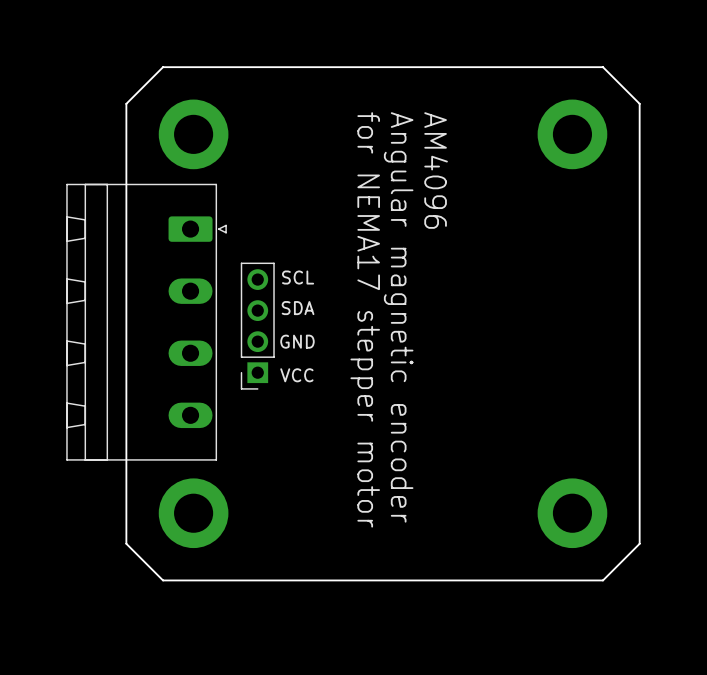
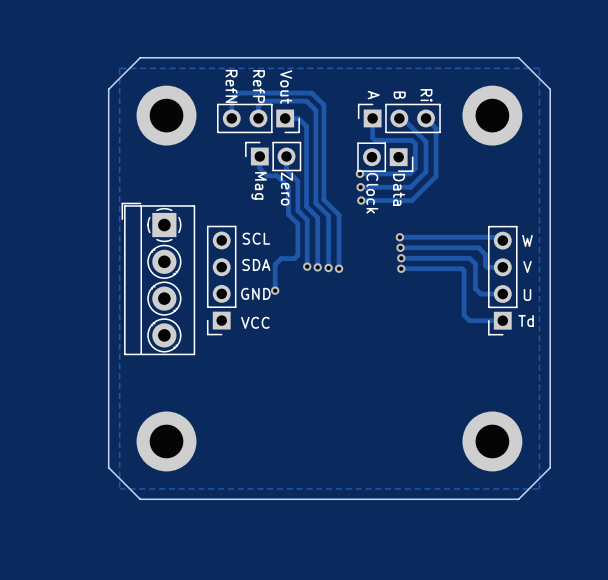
zone outline: none -> (539, 68) (539, 488) (119, 488) (119, 68) (539, 68)
text: none -> RefN (231, 86)
text: none -> RefP (258, 86)
text: none -> Vout (286, 87)
text: none -> B (399, 95)
text: none -> Ri (426, 95)
track: none -> (231, 118) (231, 99) (238, 93) (311, 93) (323, 105) (323, 199) (339, 215) (339, 268)
track: none -> (258, 118) (258, 106) (263, 101) (306, 101) (315, 110) (315, 203) (328, 215) (328, 267)
part: none -> (258, 118)
track: none -> (285, 118) (298, 118) (306, 126) (306, 206) (317, 217) (317, 267)
track: none -> (372, 118) (372, 137) (375, 140) (412, 140) (415, 143) (415, 168) (410, 173) (359, 173)
track: none -> (399, 118) (402, 118) (426, 141) (426, 171) (410, 187) (360, 187)
part: none -> (399, 118)
track: none -> (426, 118) (436, 128) (436, 176) (412, 200) (361, 200)
text: AM4096 (436, 170) -> A (373, 95)
track: none -> (259, 156) (259, 168) (267, 175) (277, 175) (288, 187) (288, 214) (297, 223) (297, 255) (294, 258) (281, 258) (275, 264) (275, 290)
part: none -> (273, 156)
track: none -> (286, 156) (286, 169) (297, 181) (297, 210) (307, 219) (307, 266)
part: none -> (385, 157)
via: none -> (359, 173)
text: none -> Mag (259, 185)
via: none -> (360, 187)
text: none -> Zero (286, 188)
text: none -> Data (399, 189)
text: none -> Clock (372, 193)
via: none -> (361, 200)
track: none -> (399, 237) (499, 237) (502, 240)
via: none -> (399, 237)
text: none -> W (527, 240)
track: none -> (400, 247) (478, 247) (485, 254) (485, 265) (487, 267) (502, 267)
via: none -> (400, 247)
track: none -> (401, 258) (469, 258) (475, 263) (475, 288) (480, 294) (502, 294)
via: none -> (401, 258)
via: none -> (307, 266)
via: none -> (317, 267)
text: none -> V (527, 266)
via: none -> (328, 267)
via: none -> (339, 268)
track: none -> (401, 268) (462, 268) (464, 270) (464, 315) (469, 320) (502, 320)
via: none -> (401, 268)
text: Angular magnetic encoder (398, 317) -> none
text: for NEMA17 stepper motor (365, 319) -> none
part: (146, 322) -> none
part: none -> (158, 278)
part: none -> (502, 280)
via: none -> (275, 290)
text: none -> U (527, 294)
text: none -> Td (526, 320)

